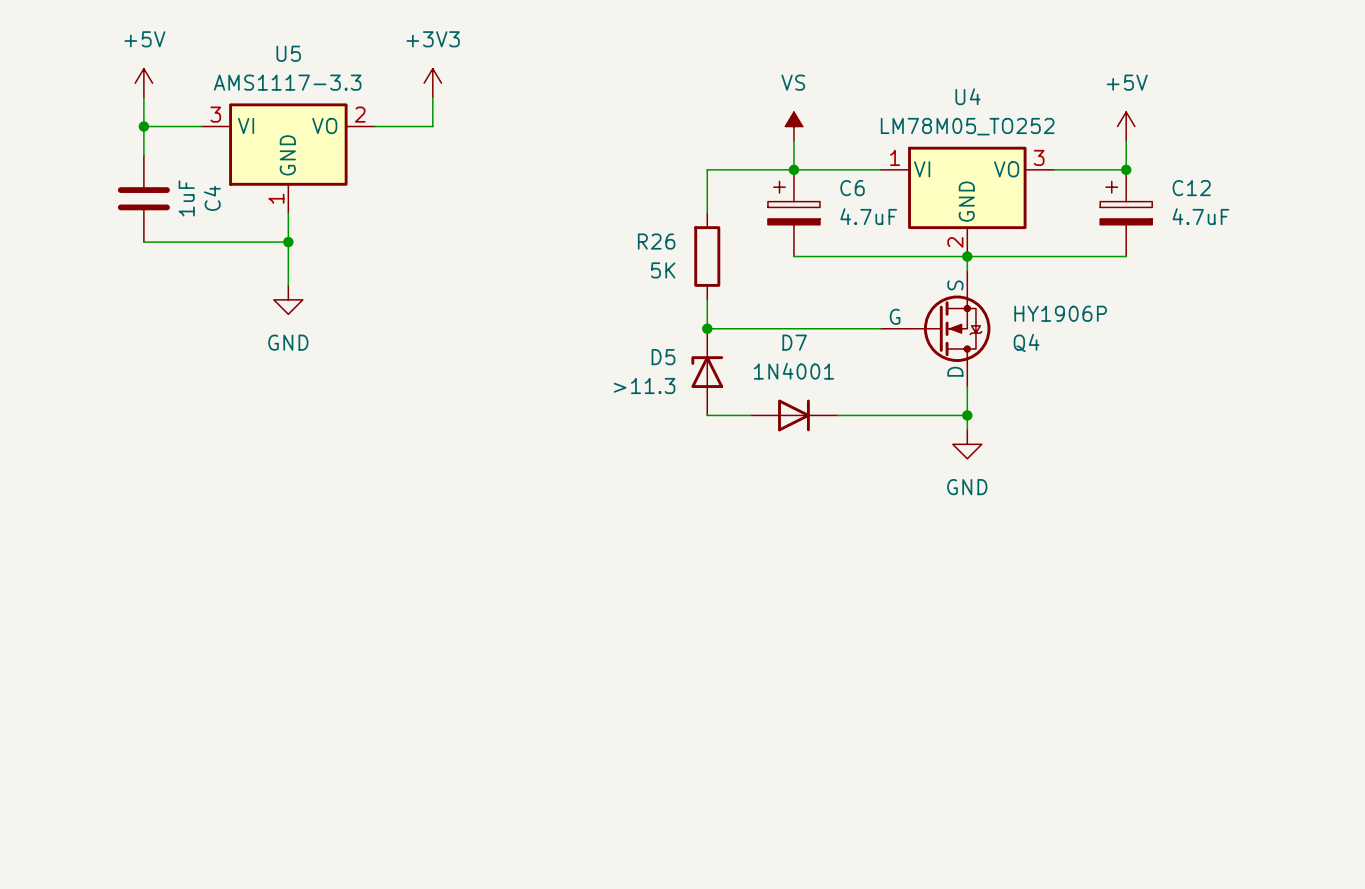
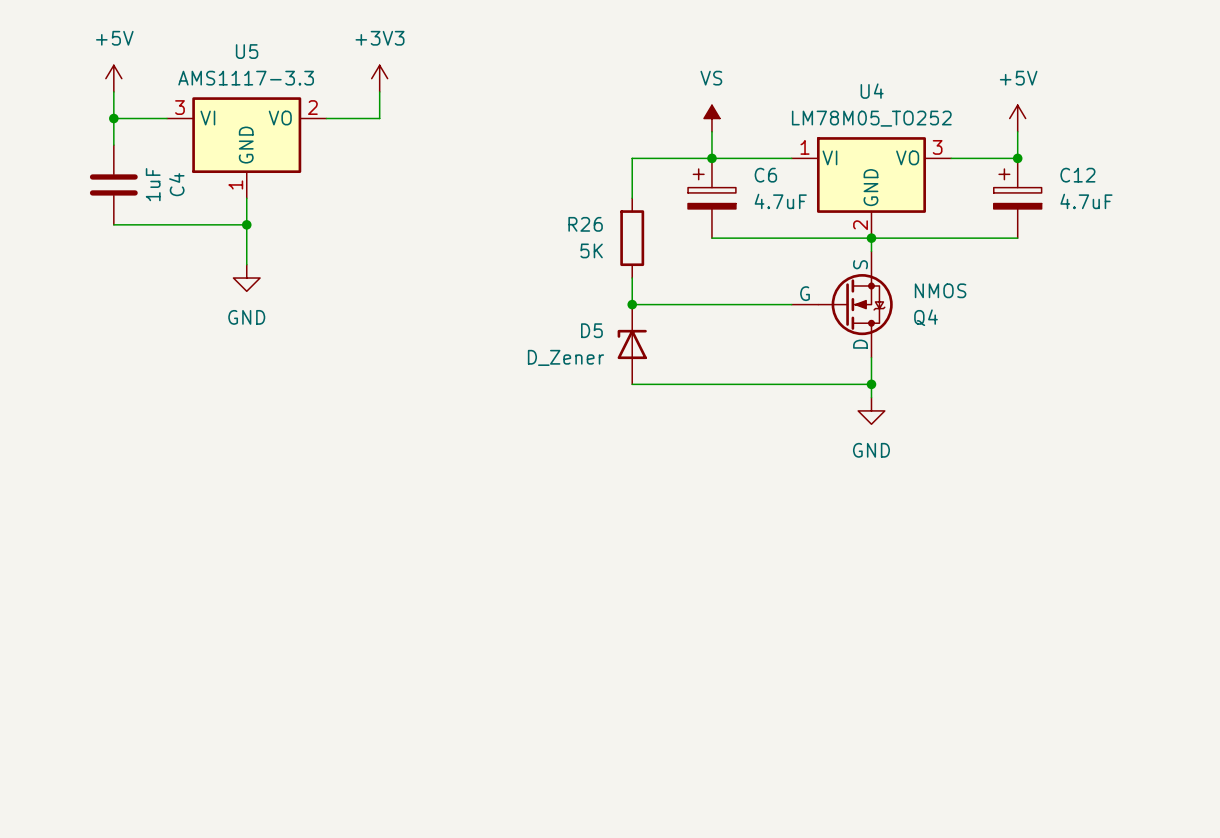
Q4 value: HY1906P (1060, 313) -> NMOS (940, 290)
D5 value: >11.3 (644, 386) -> D_Zener (565, 357)
D7: 1N4001 (793, 415) -> none

